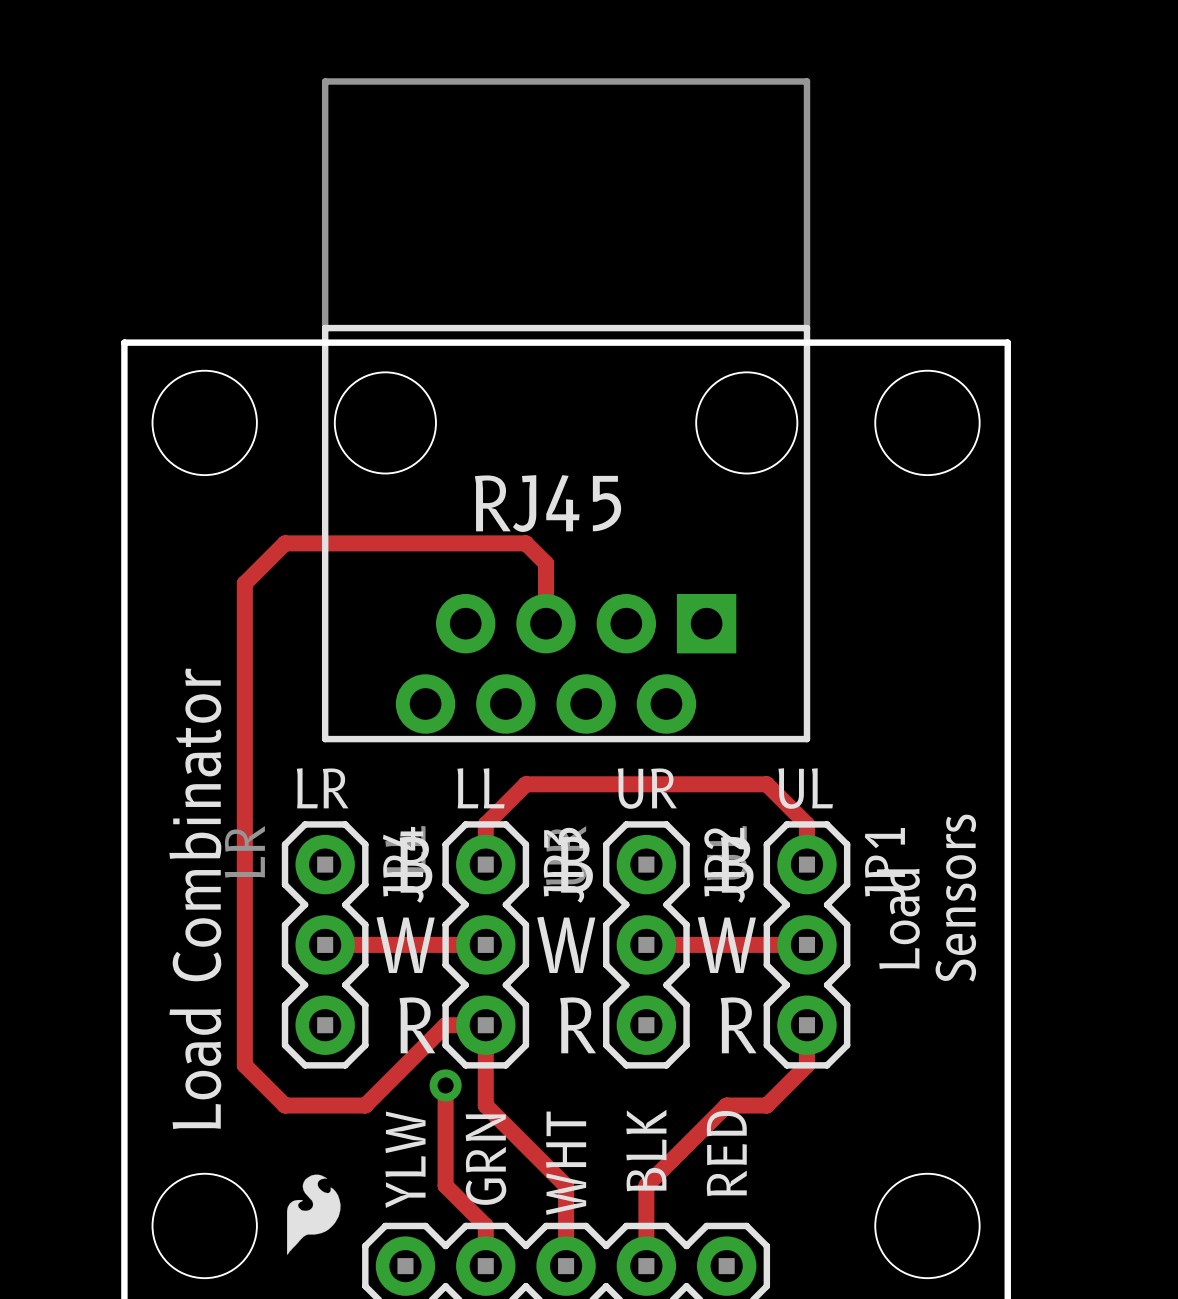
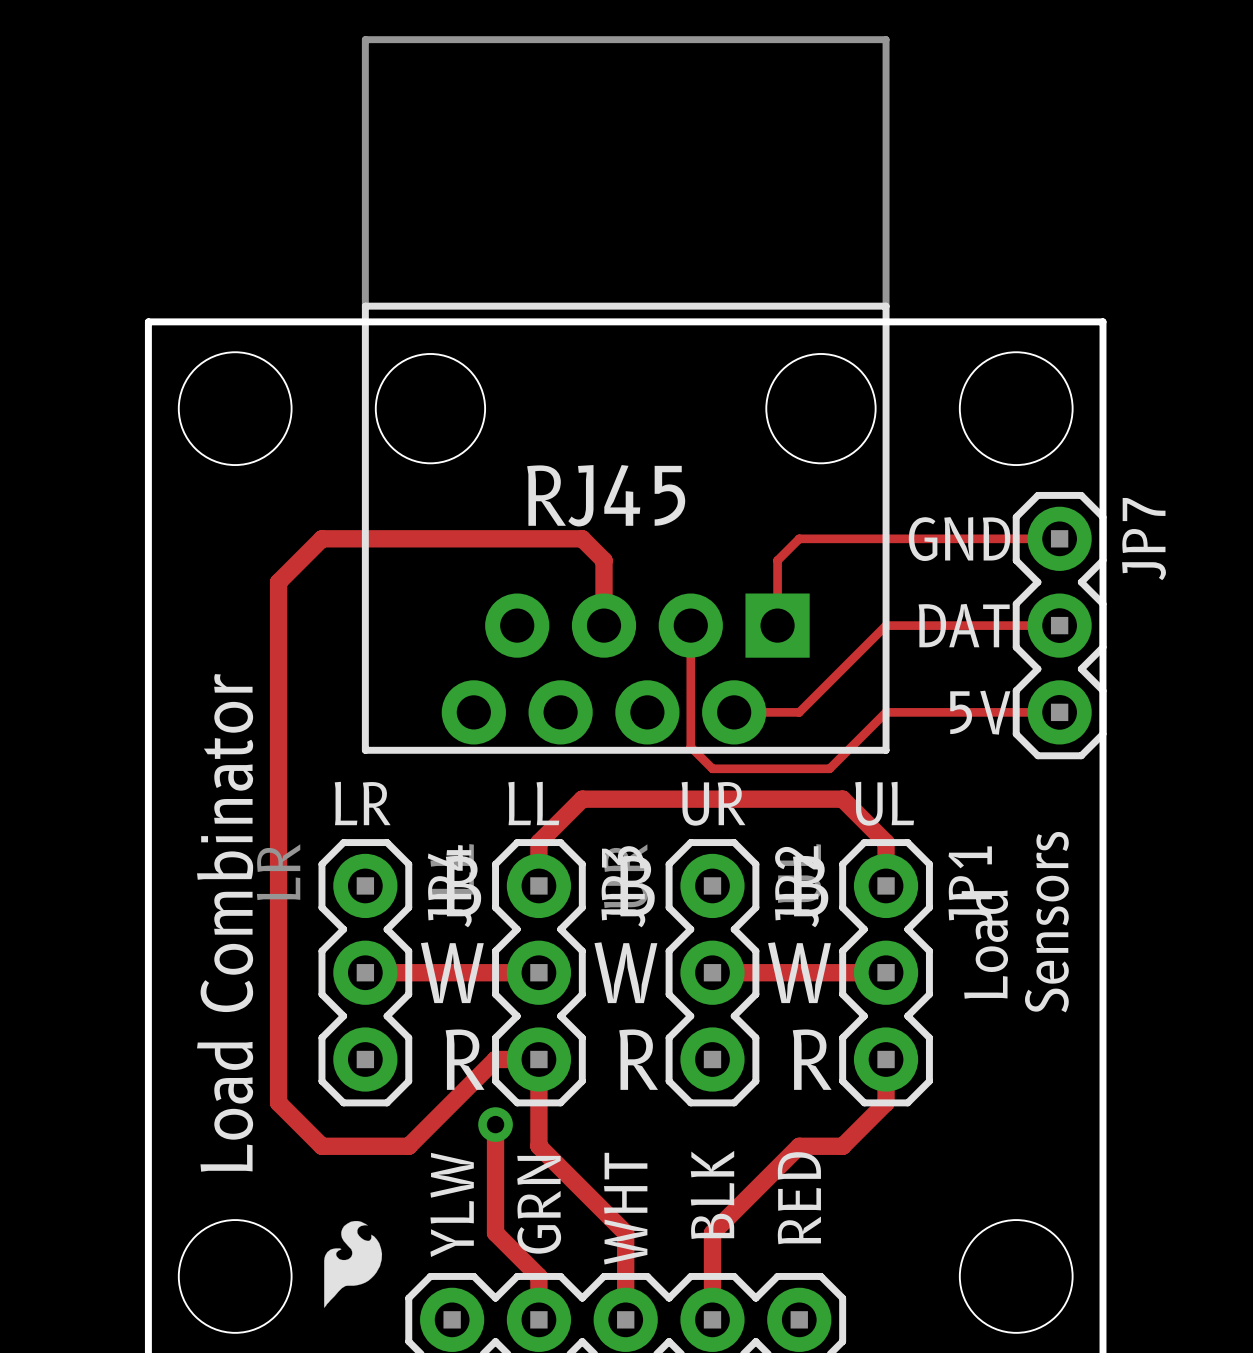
text: none -> GND (959, 539)
track: none -> (1059, 538) (799, 538) (777, 560) (777, 625)
track: none -> (690, 625) (690, 747) (712, 768) (829, 768) (886, 712) (1059, 712)
text: none -> DAT (964, 625)
track: none -> (1059, 625) (886, 625) (799, 712) (734, 712)
JP7: none -> (1059, 625)
text: none -> 5V (980, 712)

